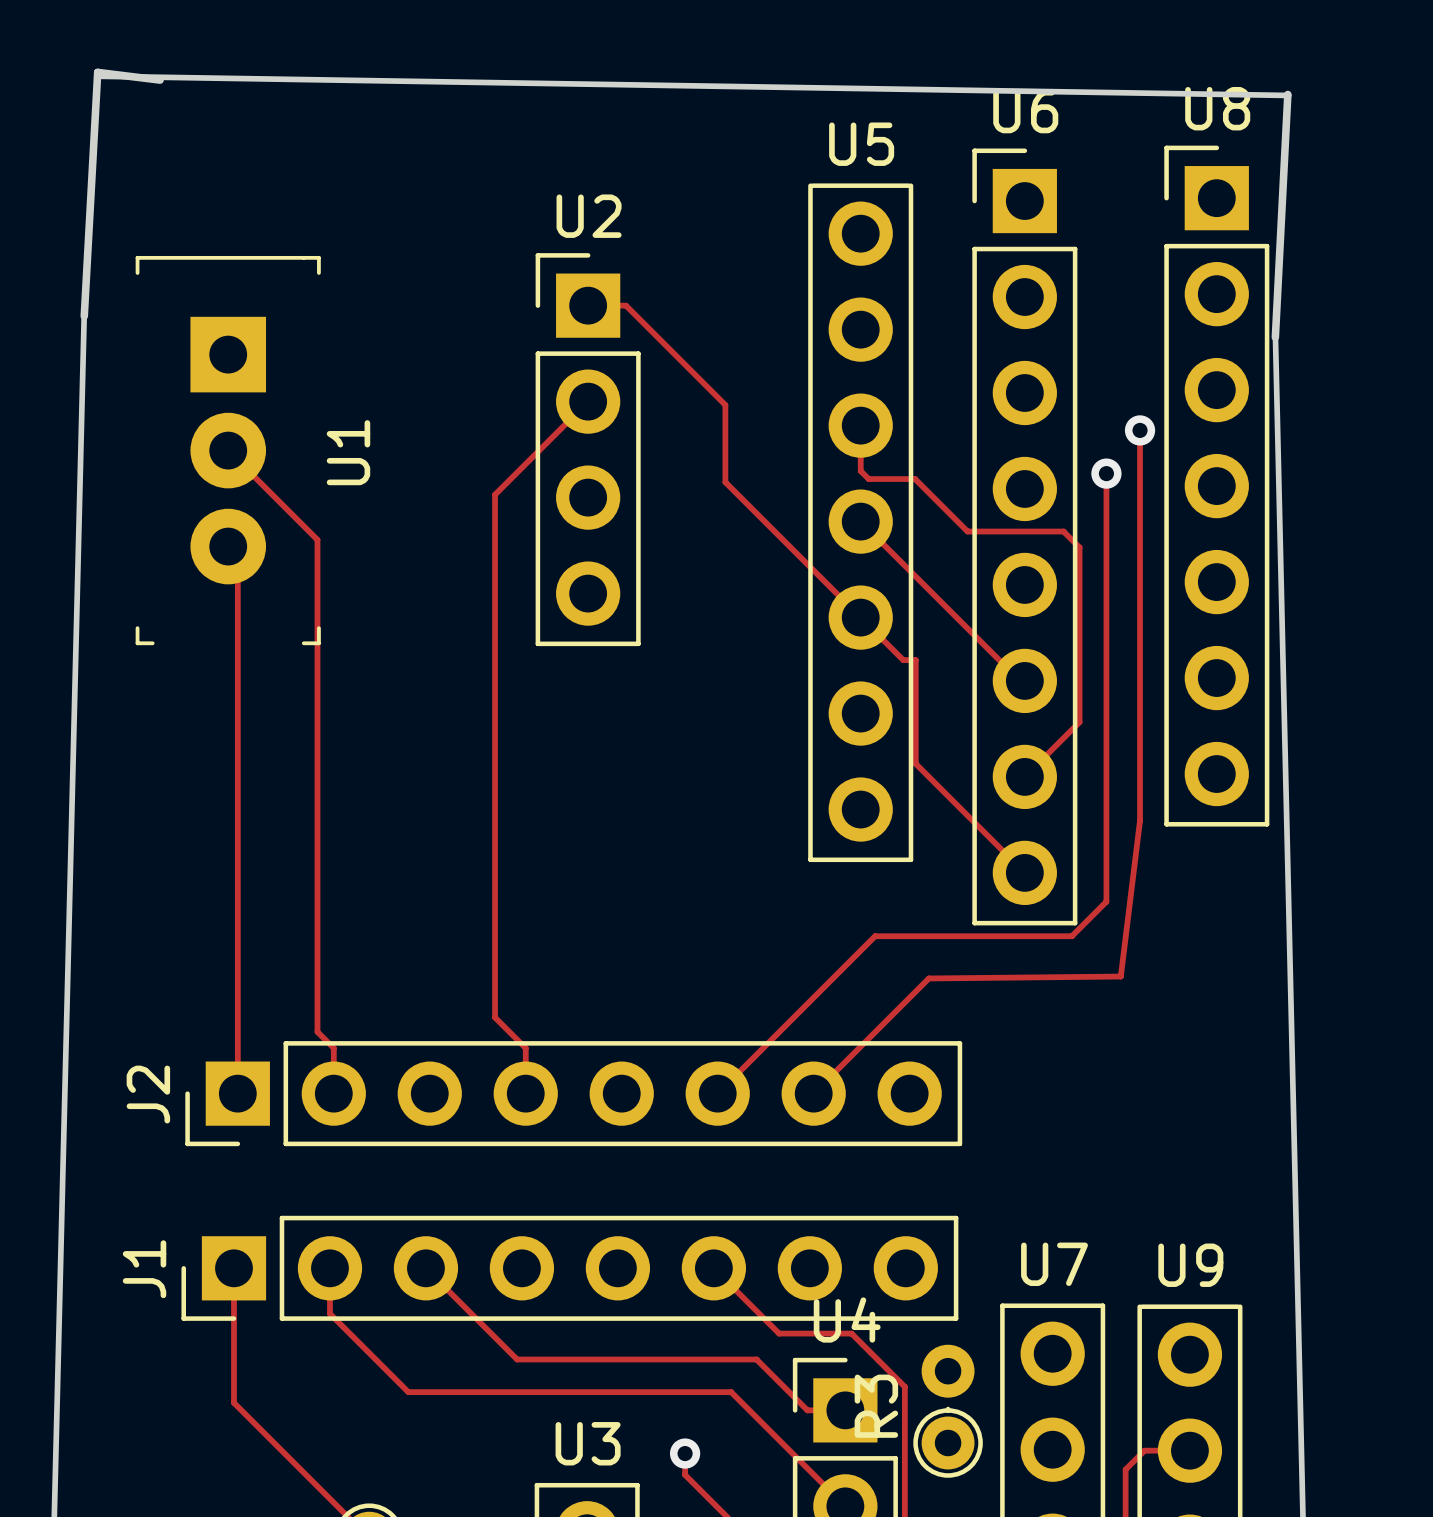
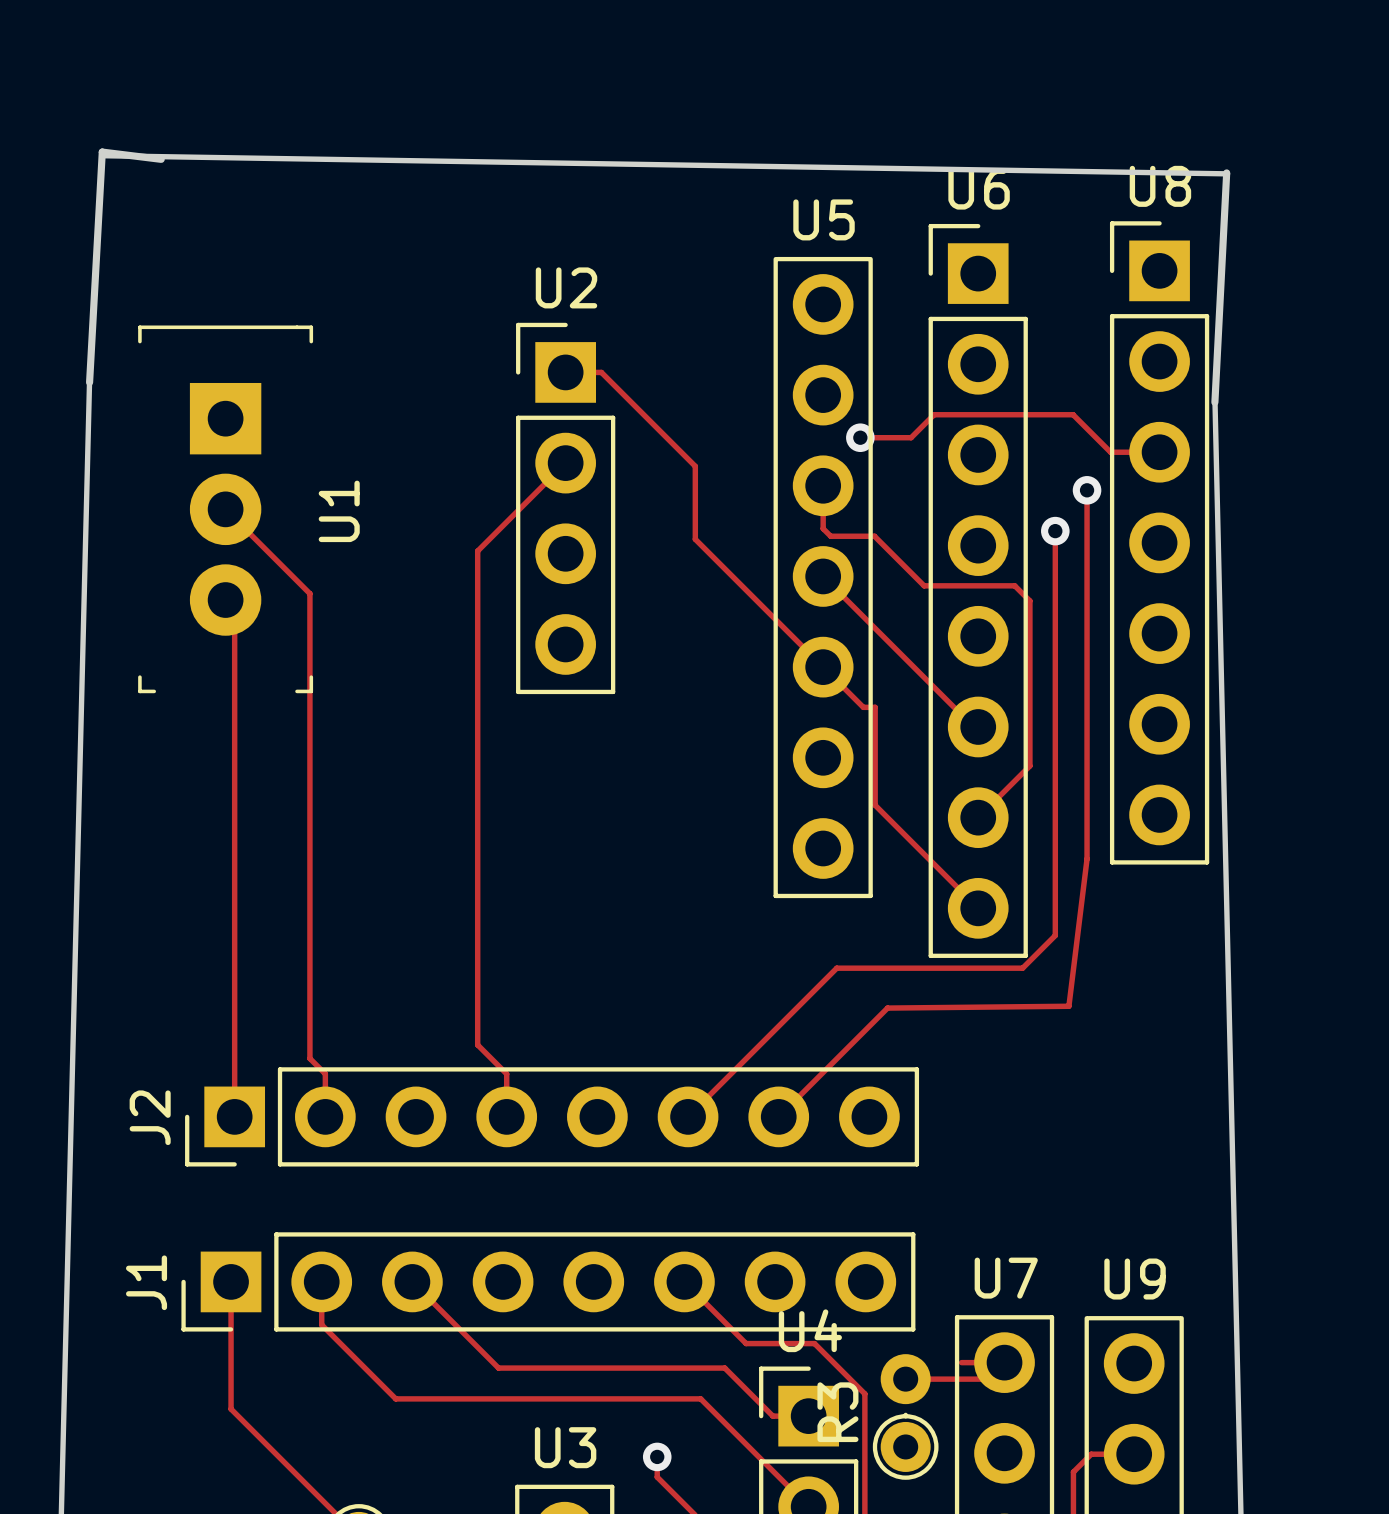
track: none -> (860, 437) (911, 437) (934, 414) (1073, 414) (1110, 452) (1159, 452)
via: none -> (860, 437)
track: none -> (961, 1362) (1004, 1362) (988, 1379) (905, 1379)

